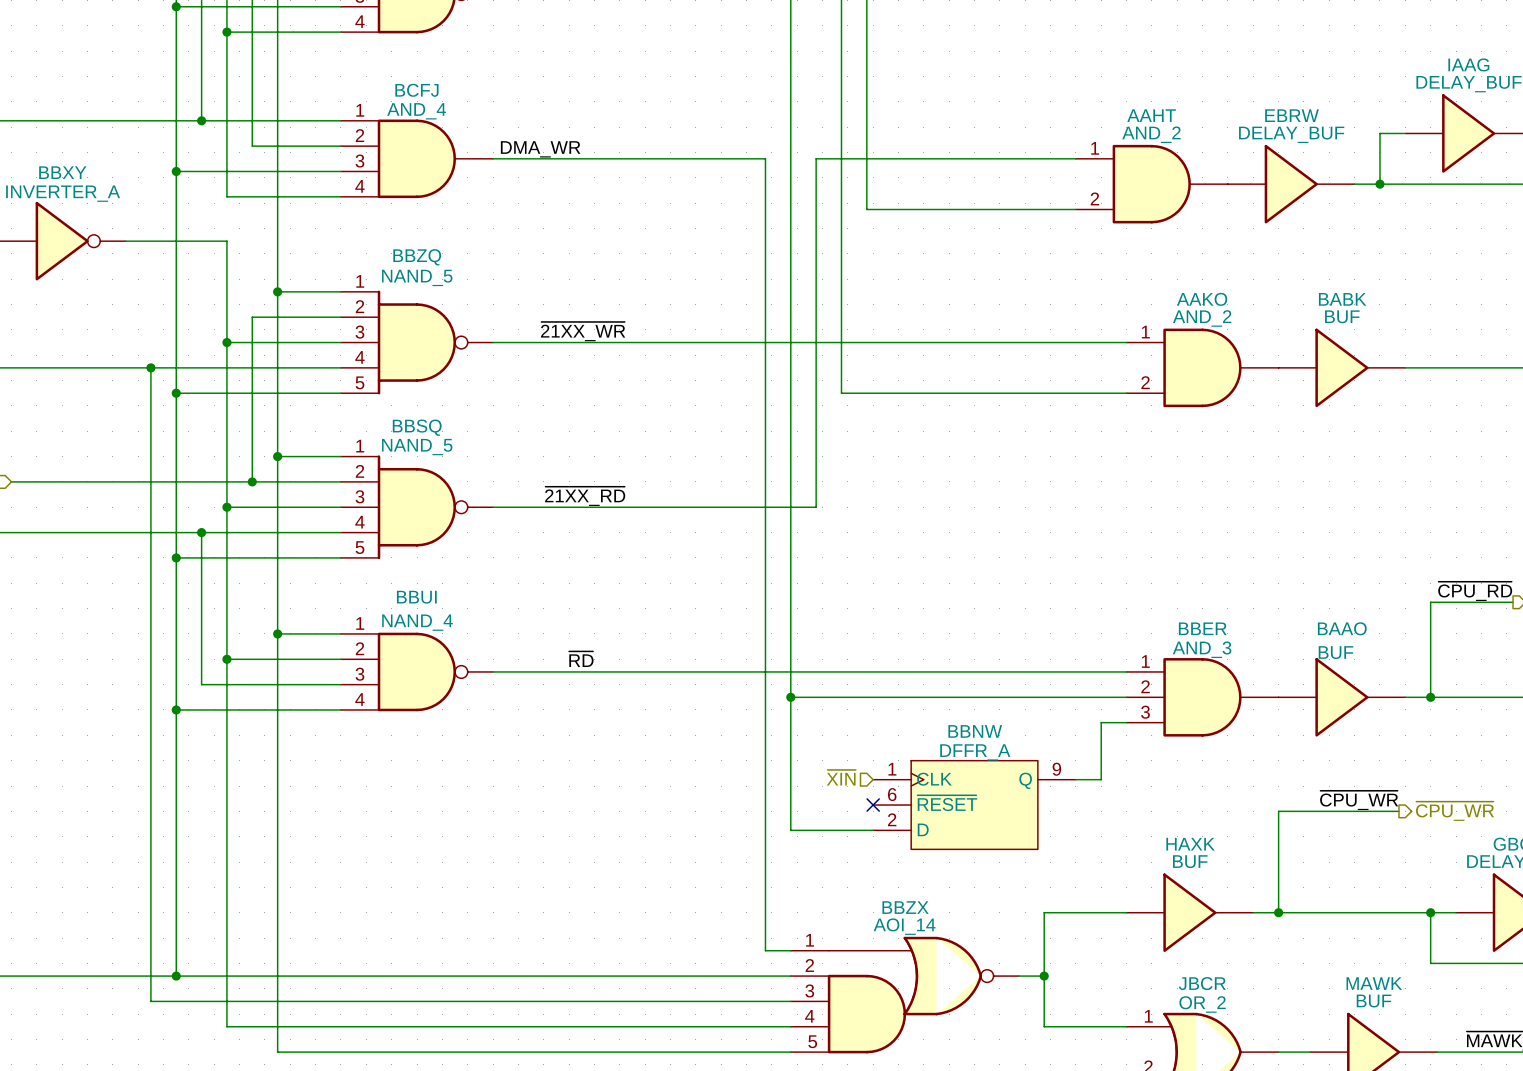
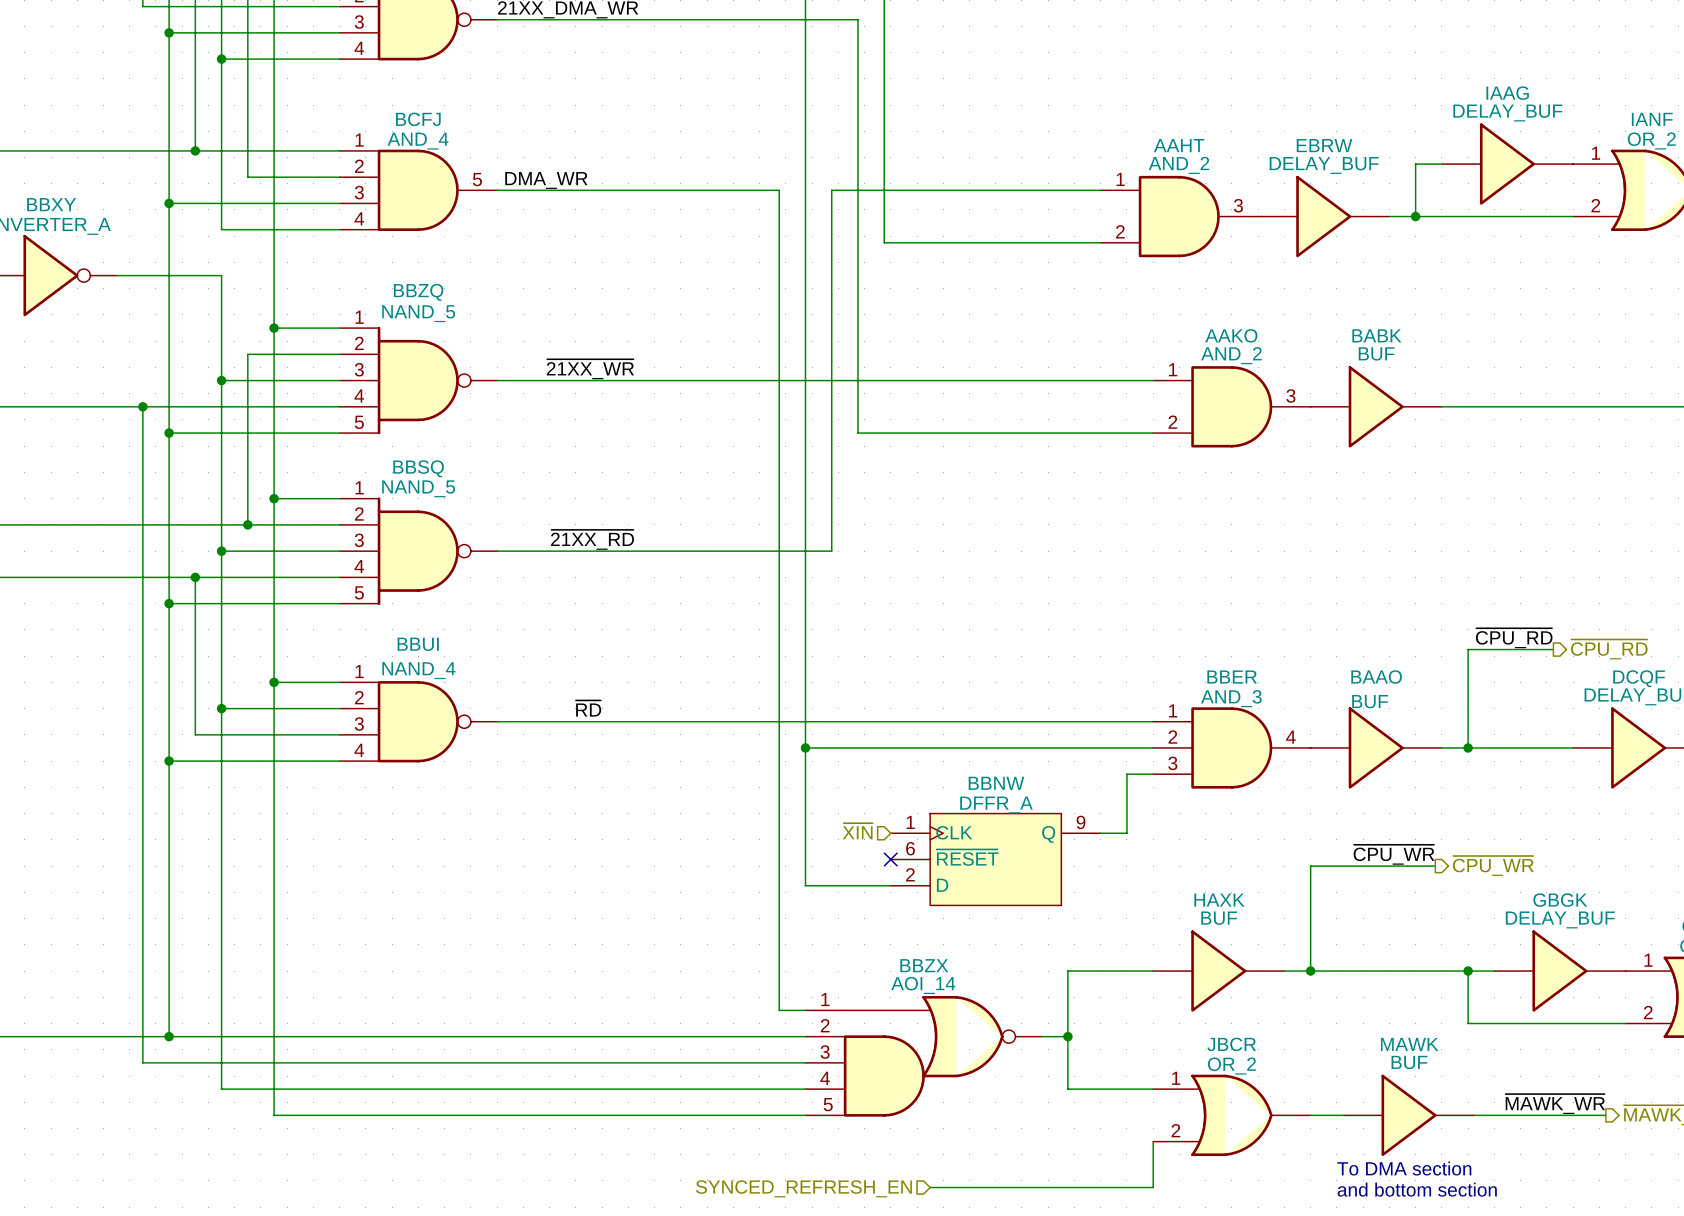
BCFJ pin number: none -> 5 (477, 179)
AAHT pin number: none -> 3 (1238, 205)
AAKO pin number: none -> 3 (1290, 395)
BBER pin number: none -> 4 (1290, 737)

